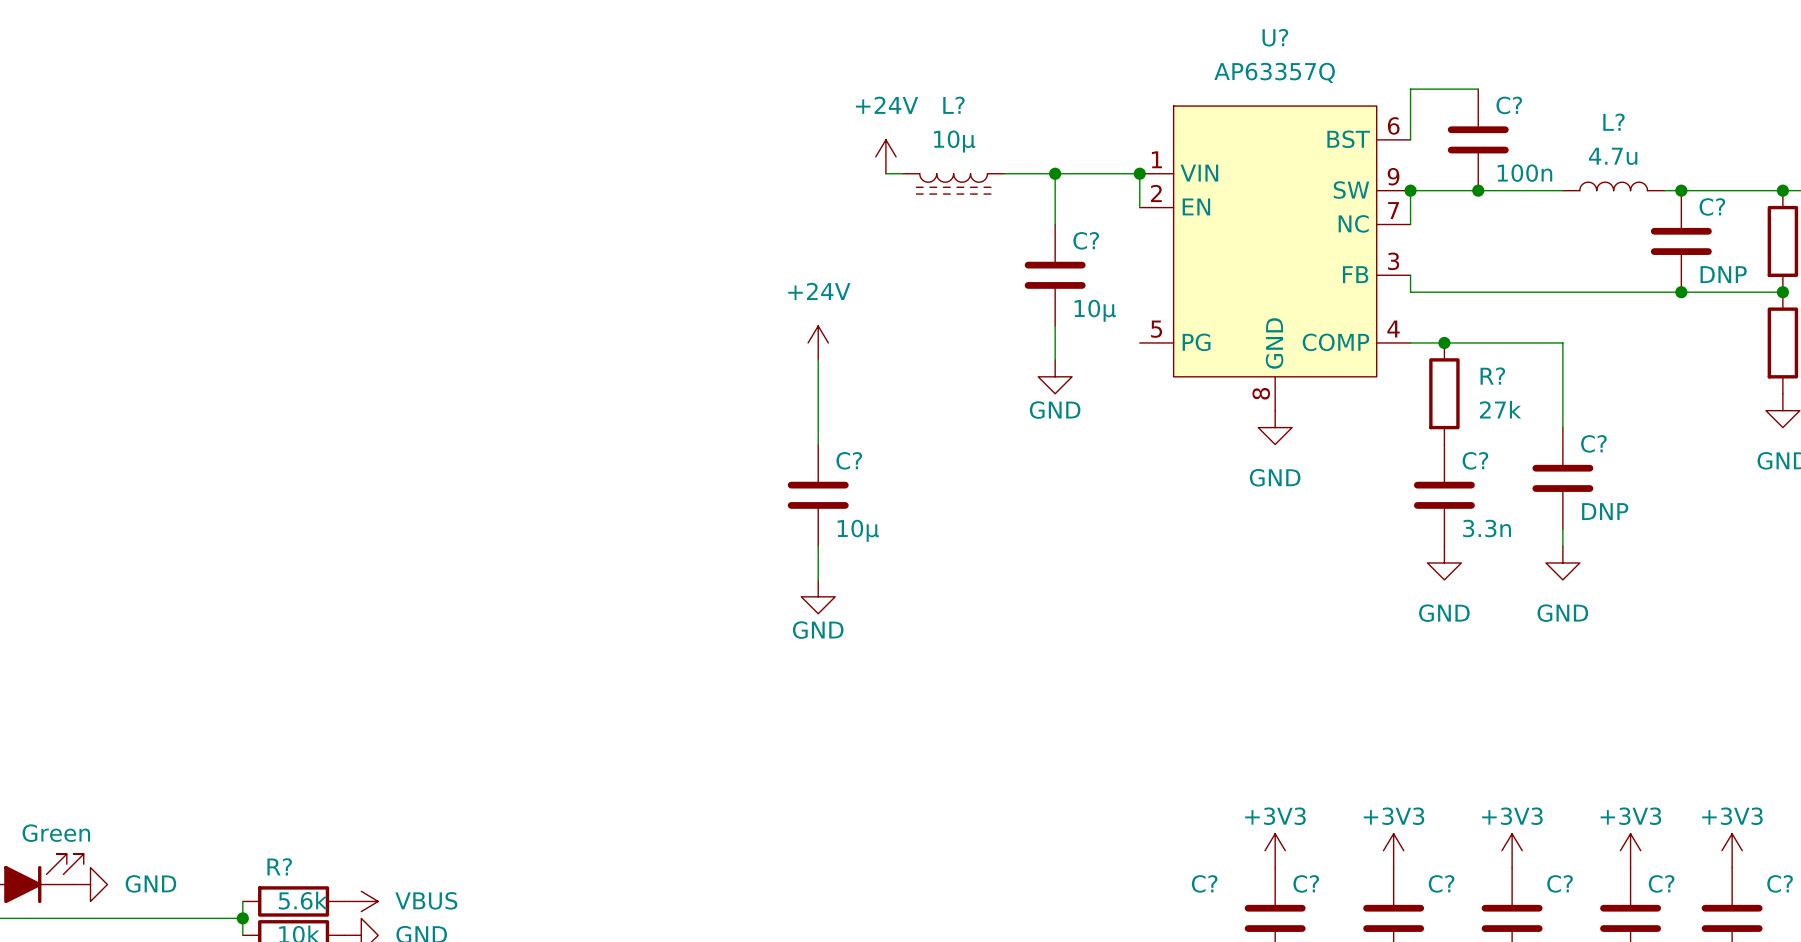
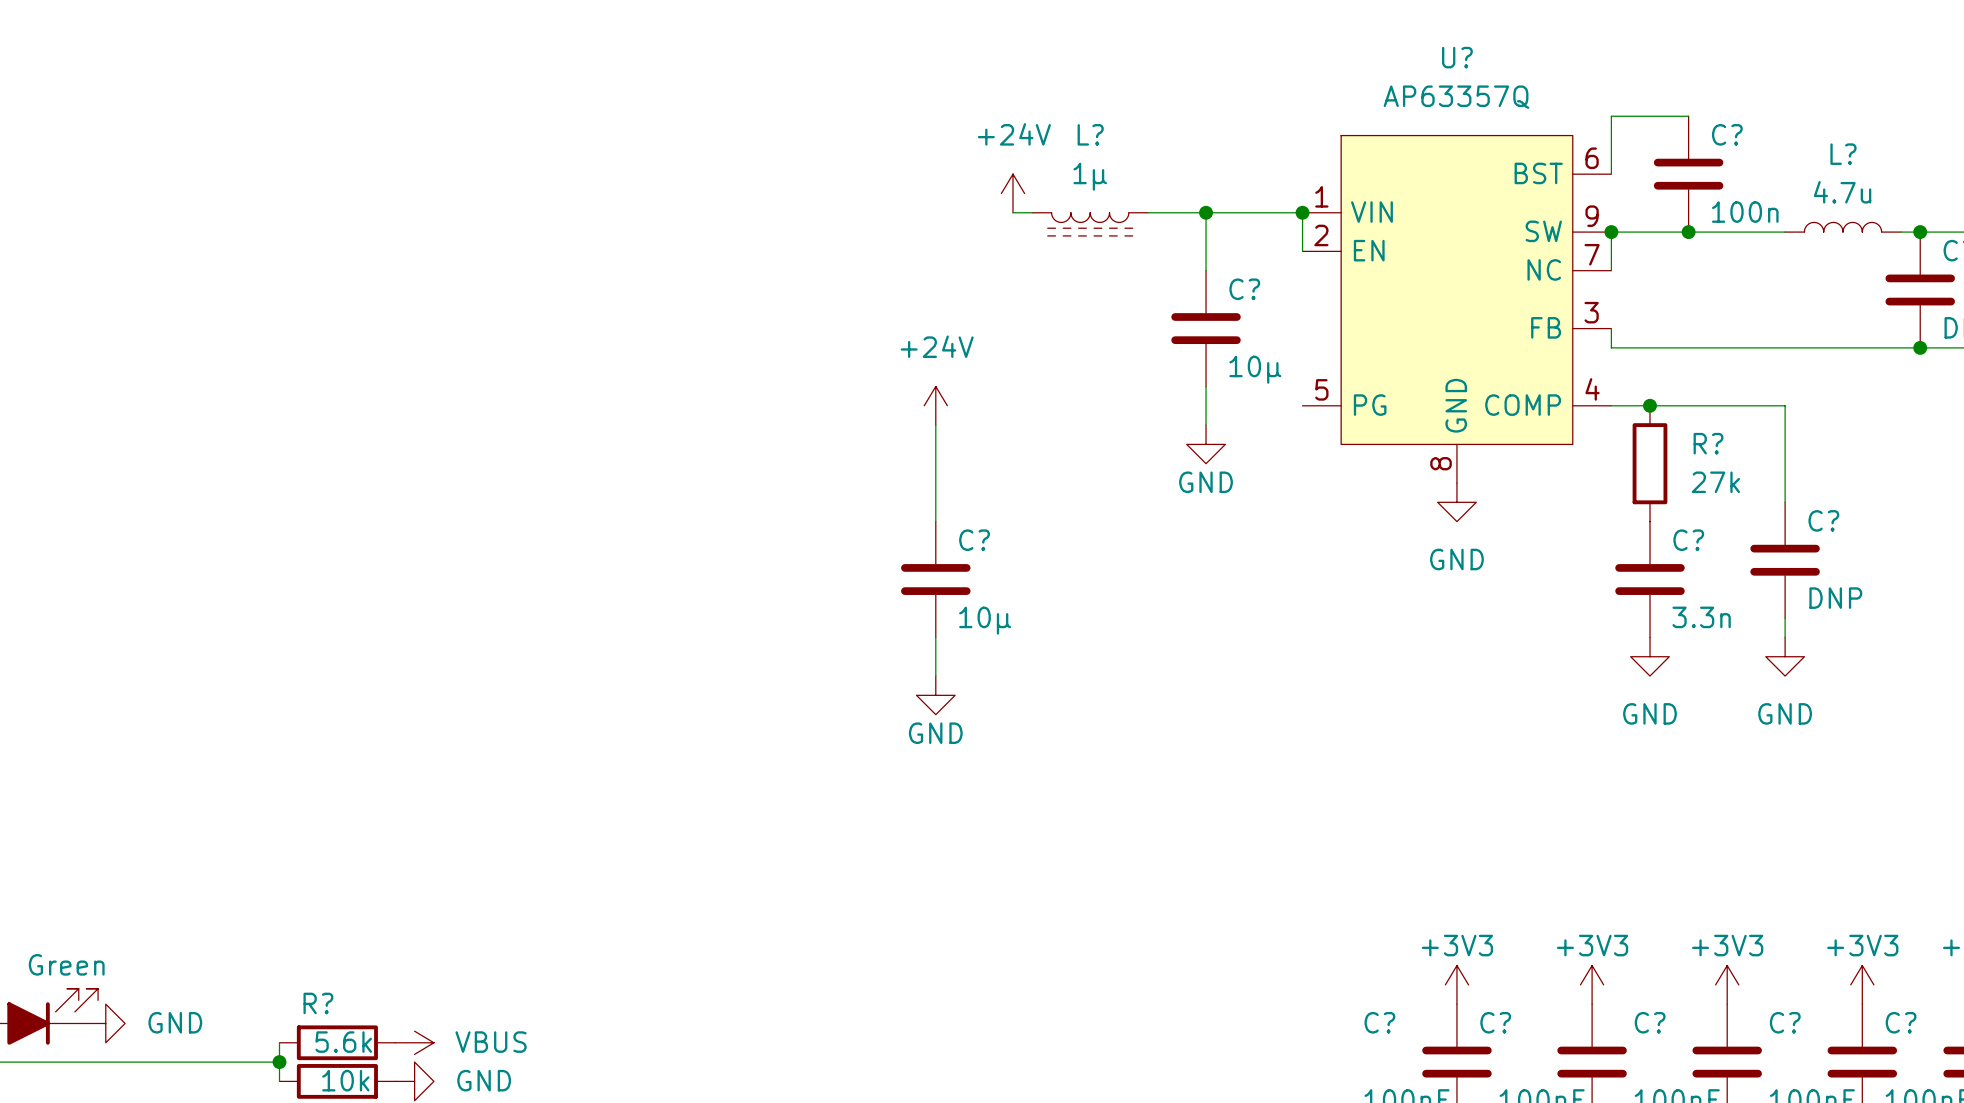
L? value: 10µ (954, 141) -> 1µ (1090, 176)

